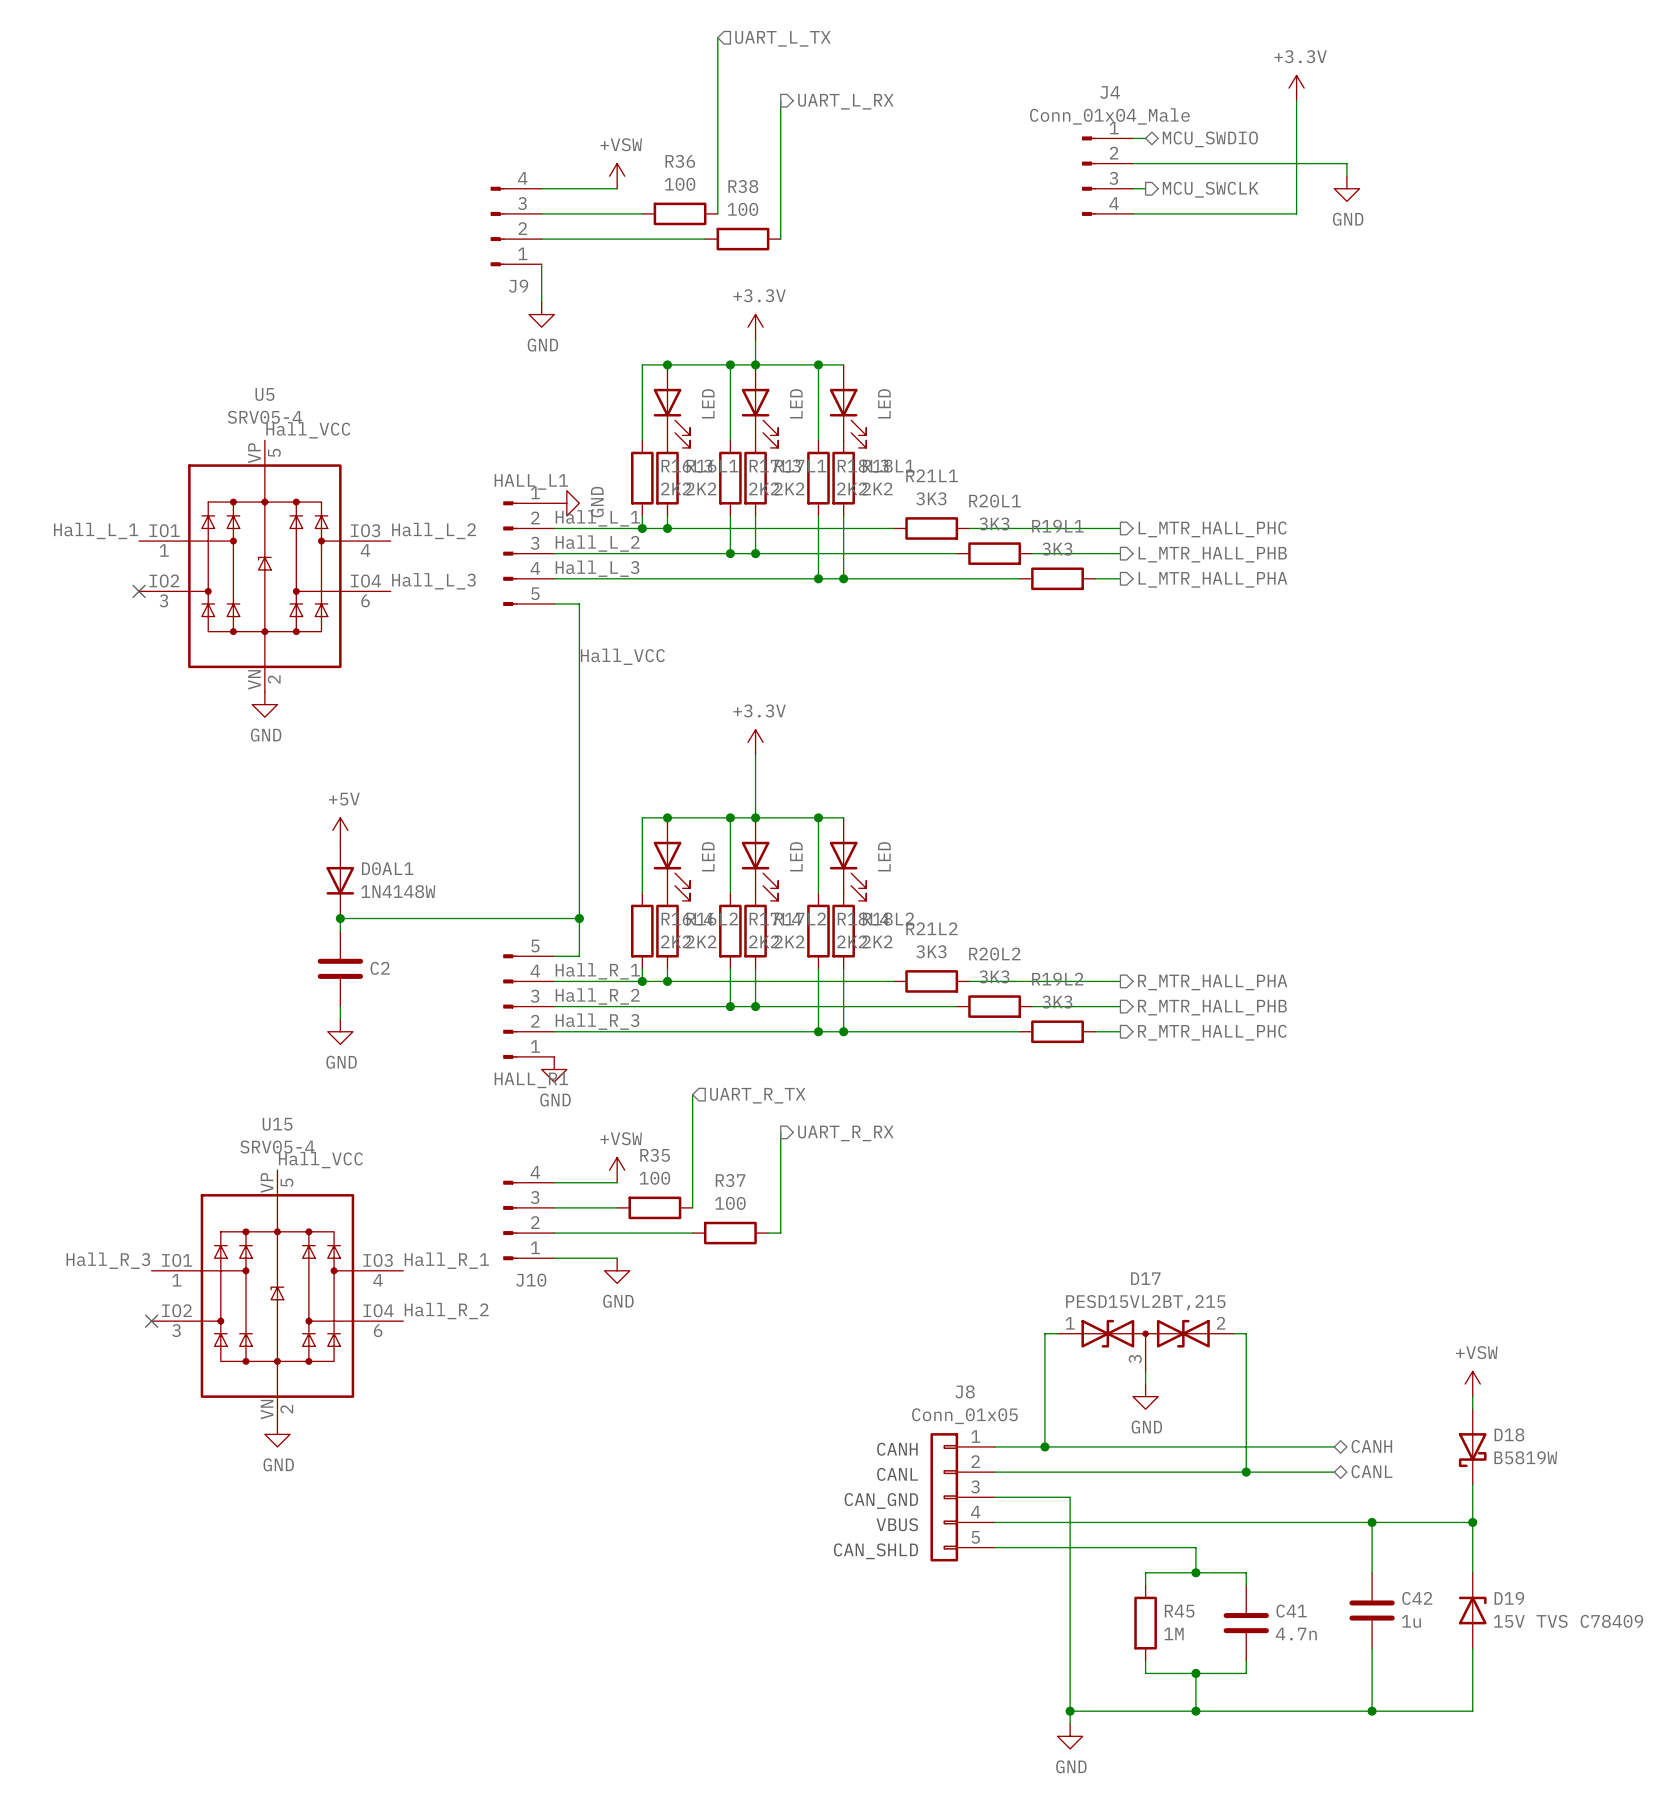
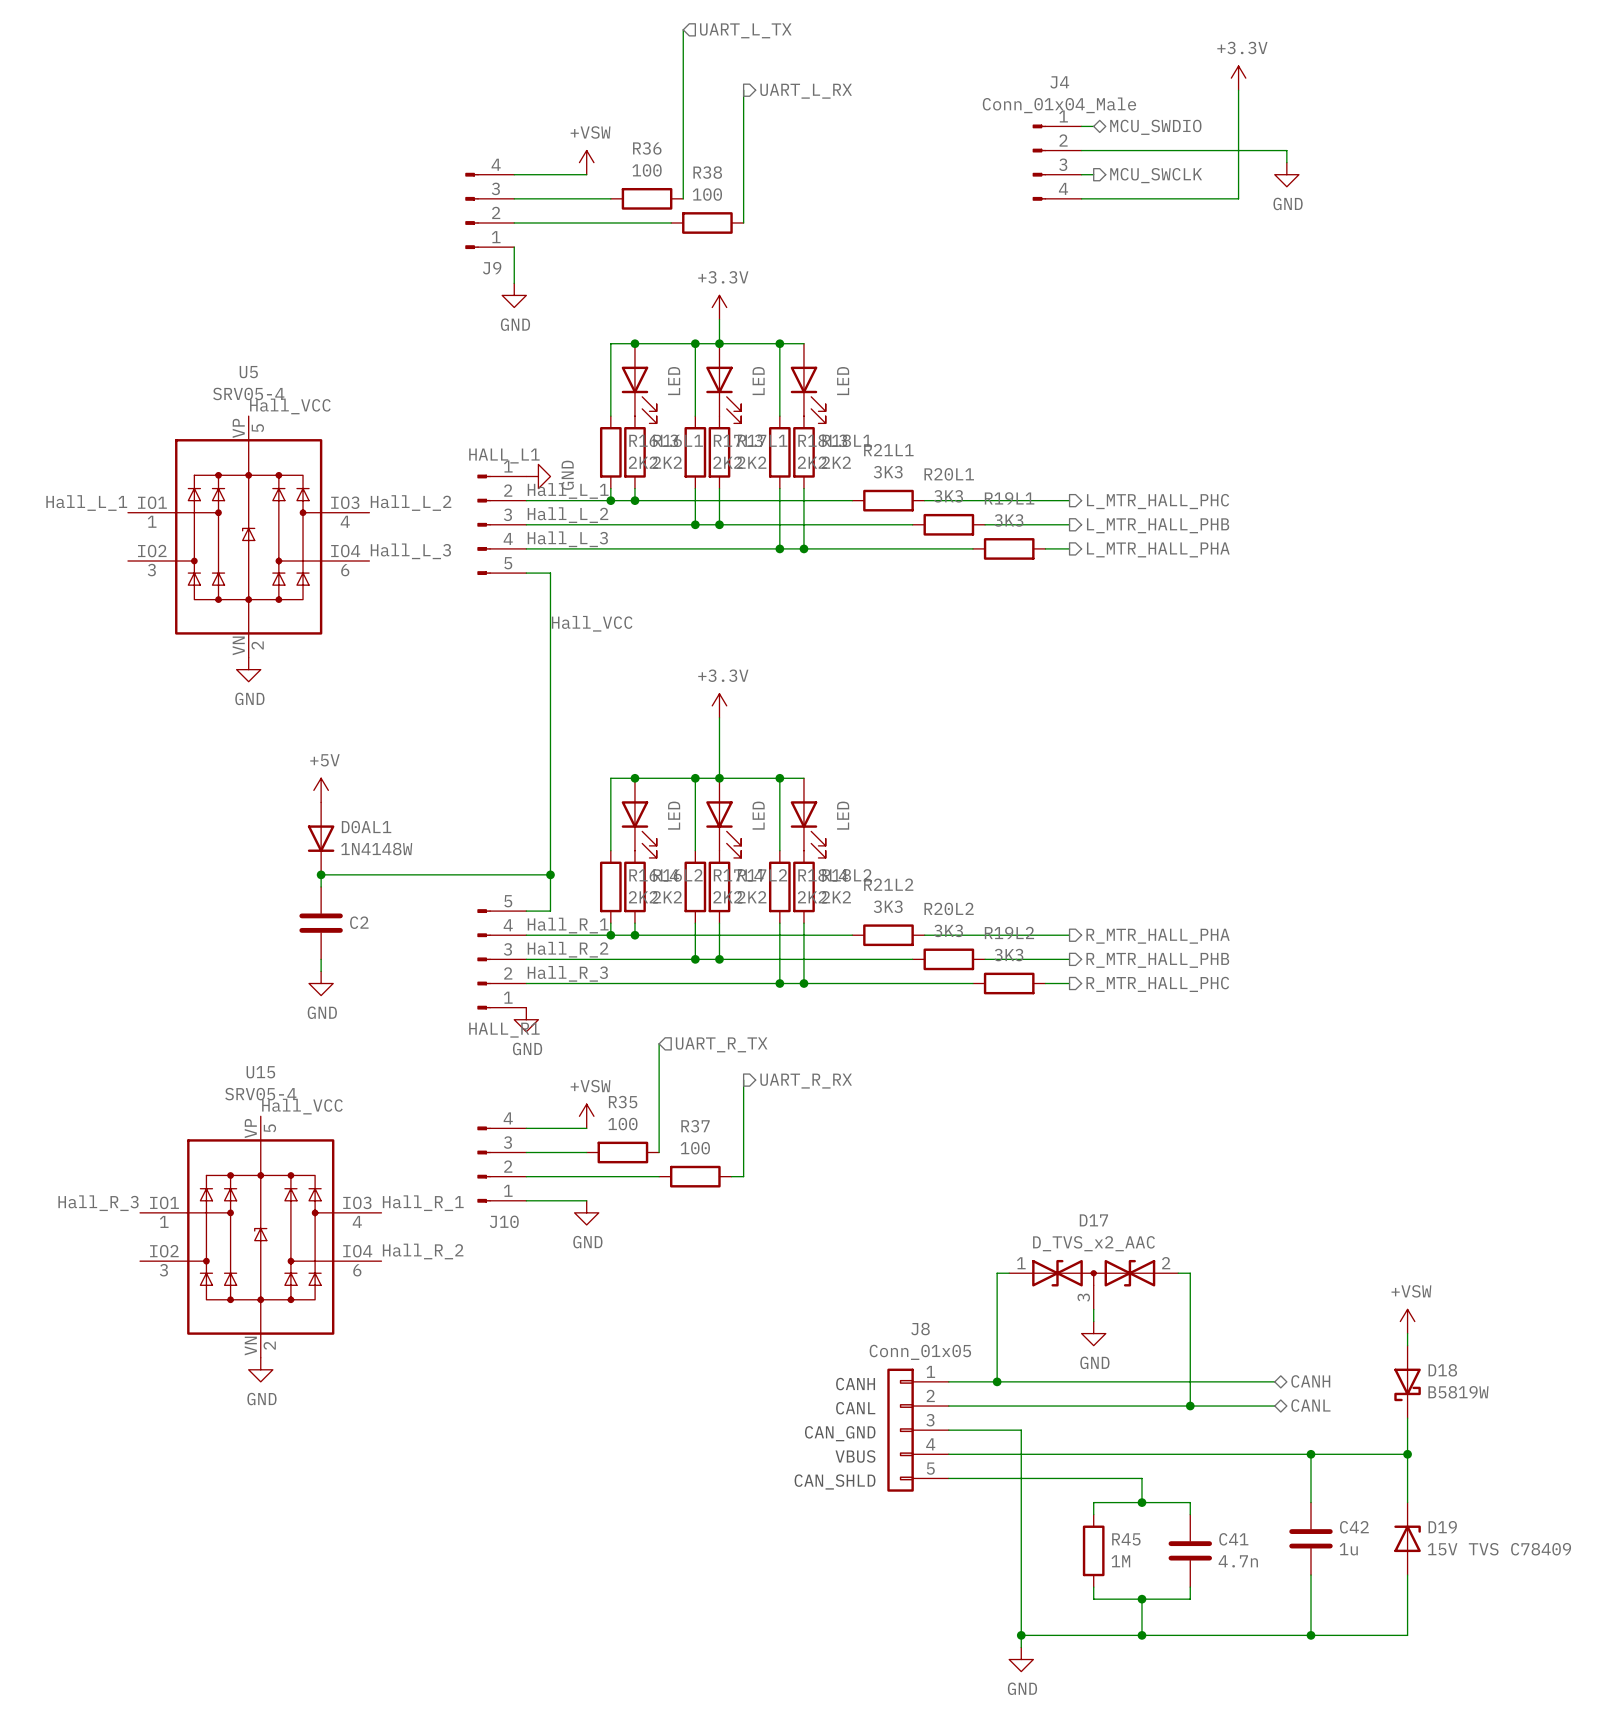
no-connect mark: (139, 591) -> none
D17 value: PESD15VL2BT,215 (1145, 1302) -> D_TVS_x2_AAC (1093, 1243)
no-connect mark: (151, 1321) -> none

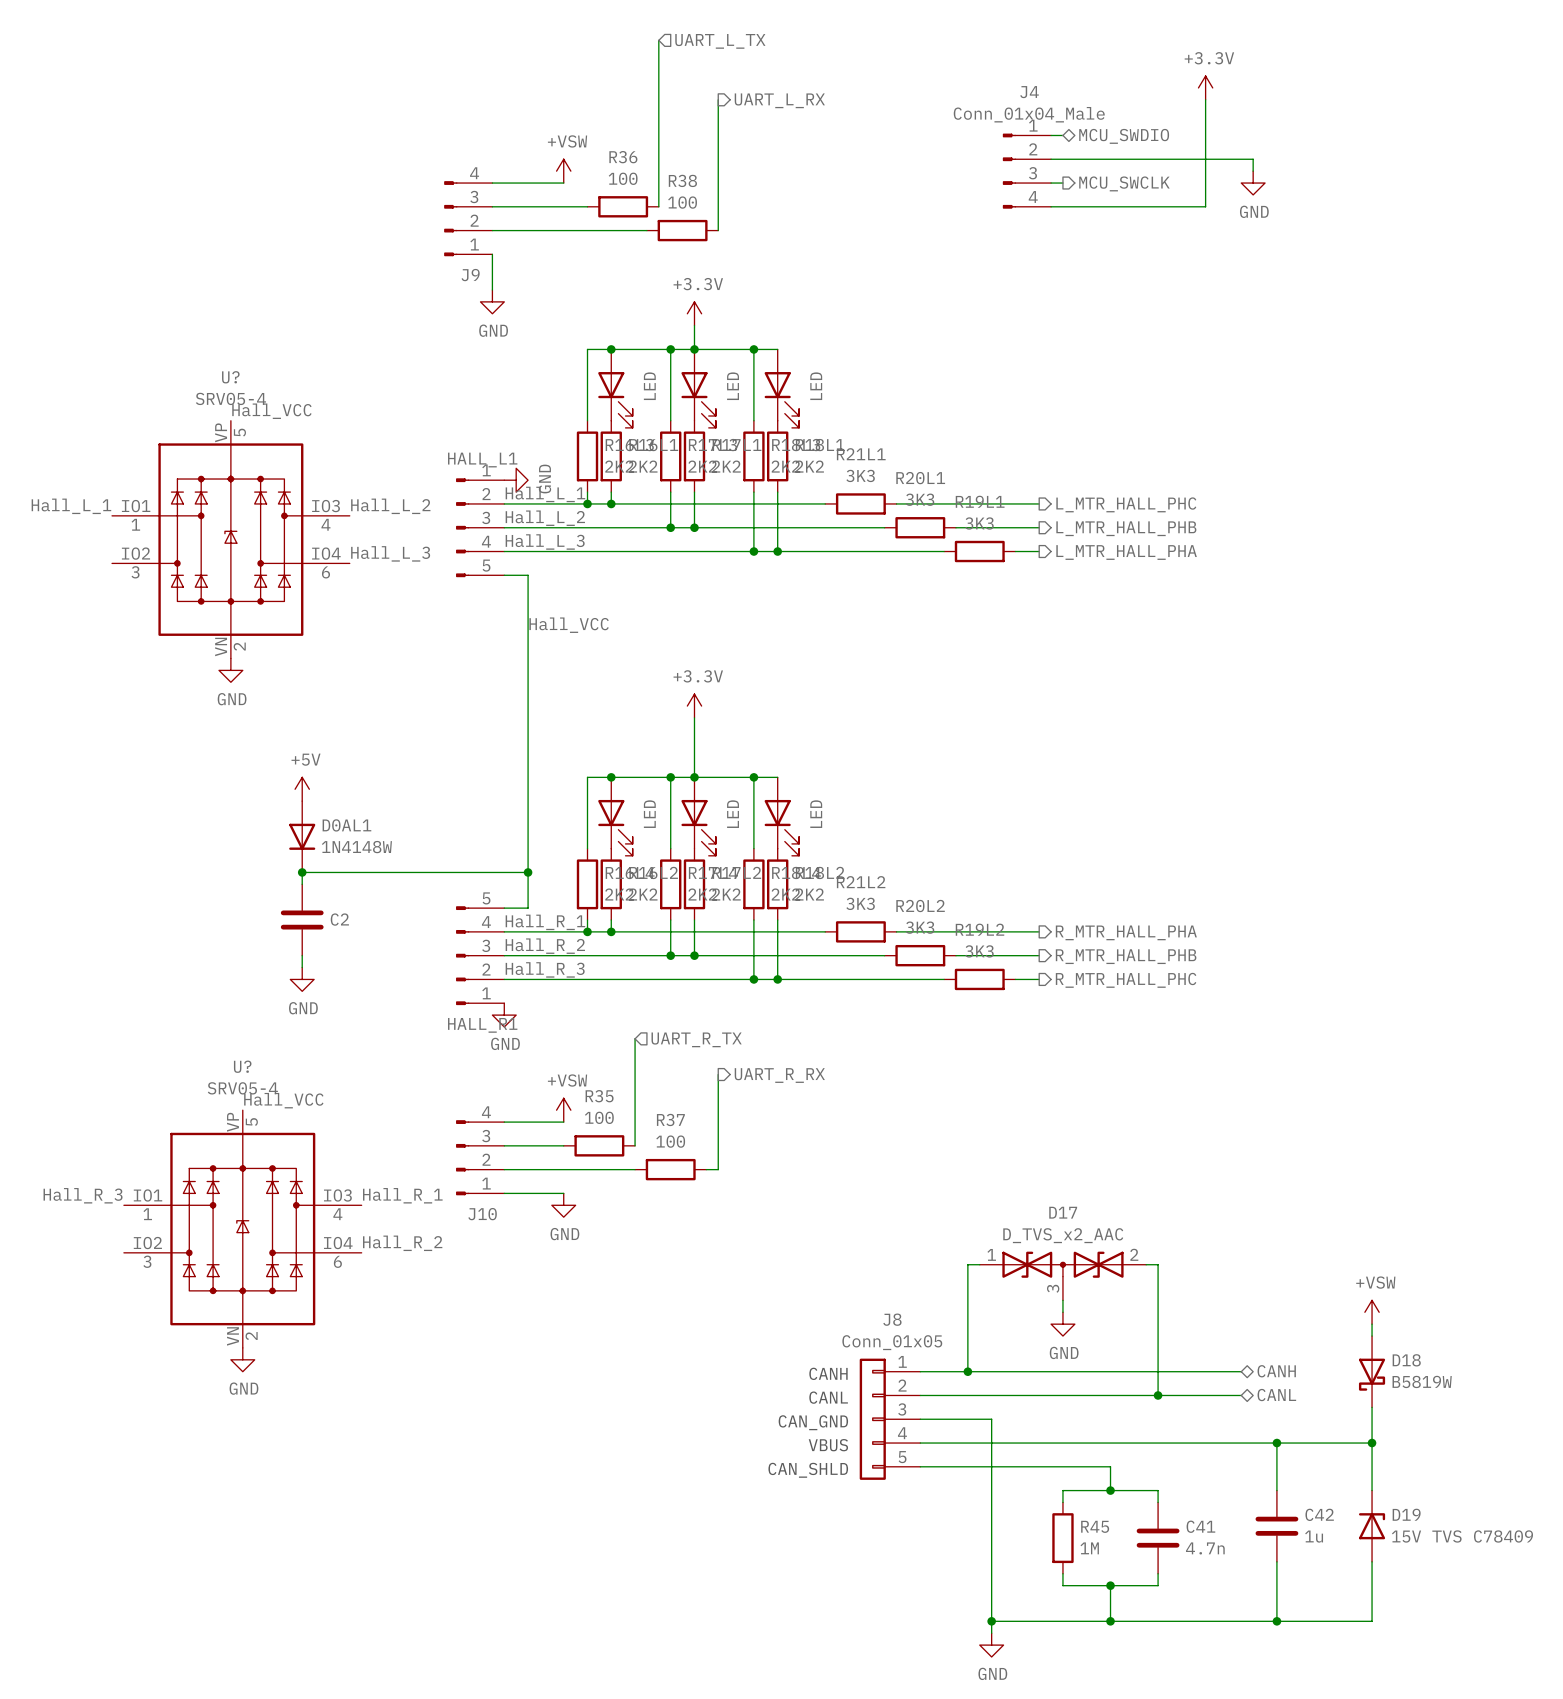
U5 name: U5 (248, 372) -> U? (230, 377)
U15 name: U15 (260, 1072) -> U? (242, 1066)

